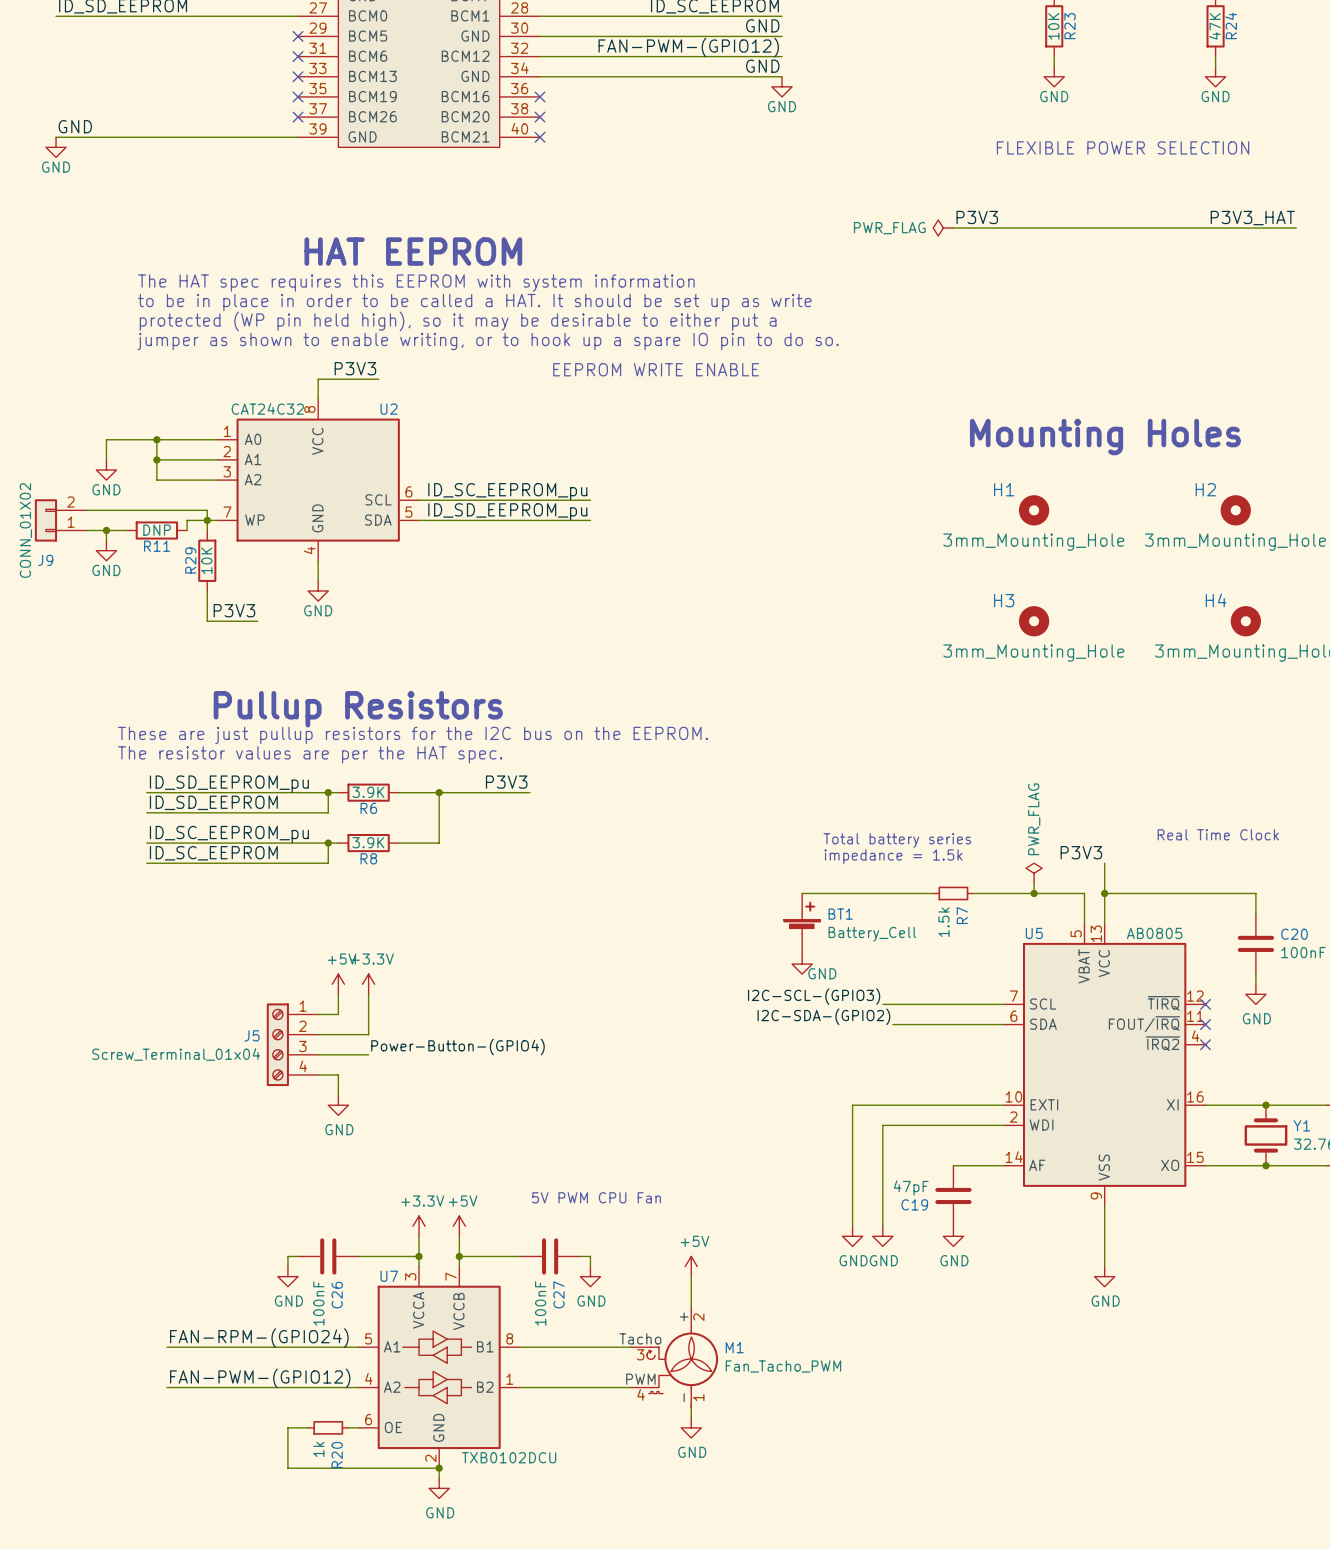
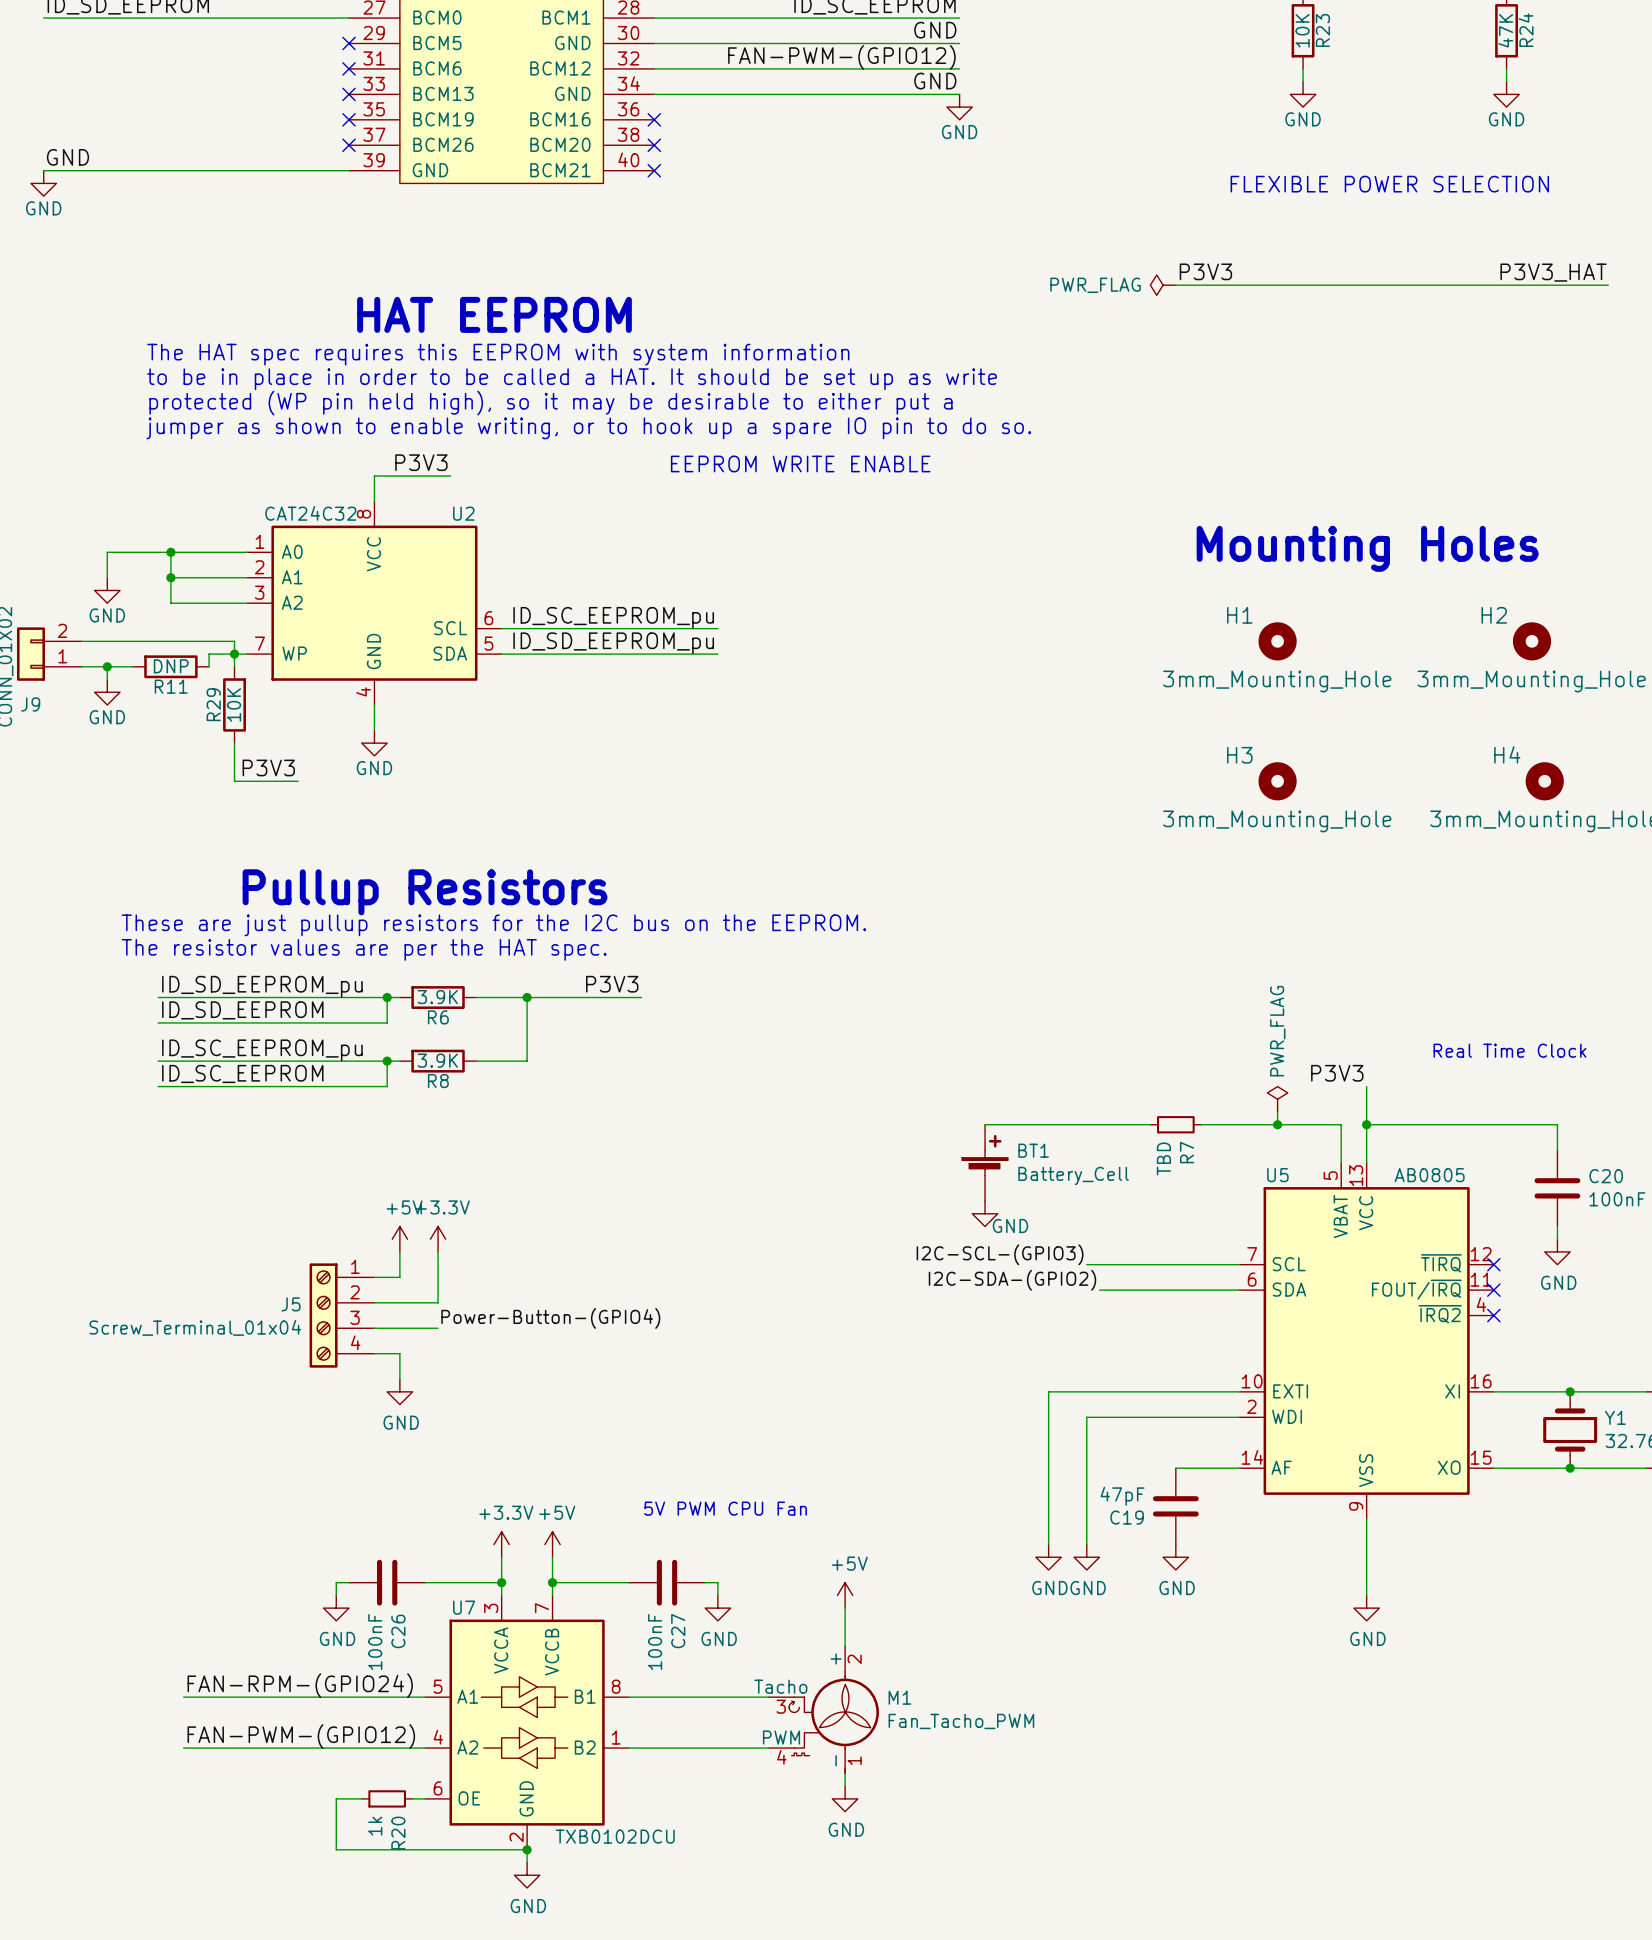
text: Total battery series (897, 840) -> none
text: impedance = 1.5k (893, 856) -> none
R7 value: 1.5k (943, 922) -> TBD (1163, 1158)

